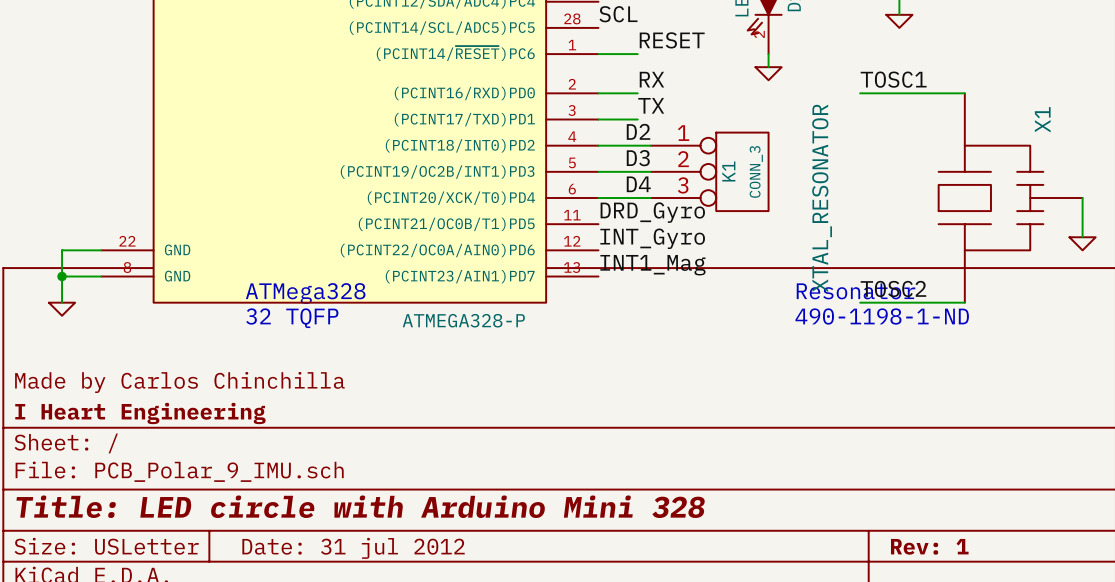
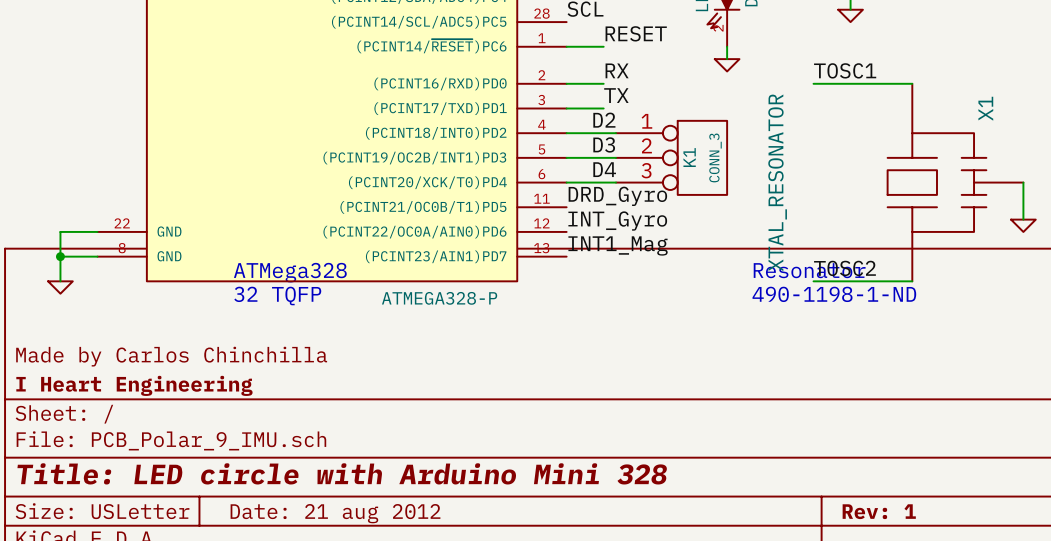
title block: Date: 31 jul 2012 (353, 548) -> Date: 21 aug 2012 (335, 513)

